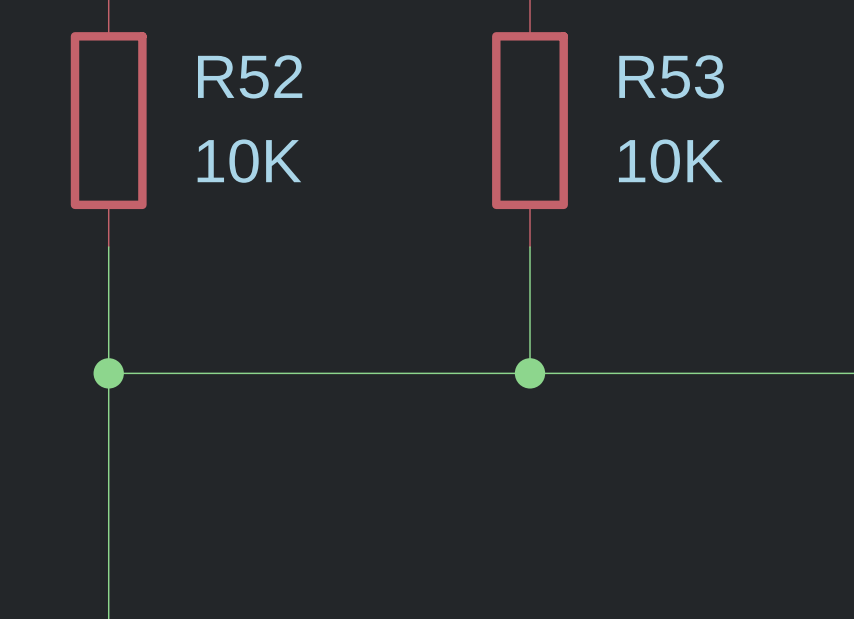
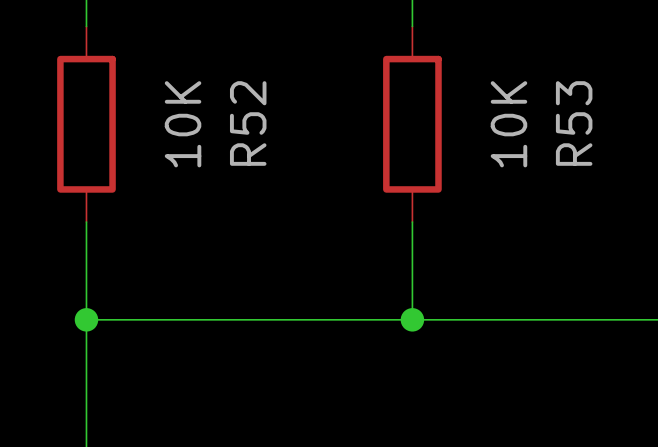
R52 name rotation: 0° (250, 76) -> 90° counterclockwise (248, 123)
R53 name rotation: 0° (671, 76) -> 90° counterclockwise (574, 123)
R52 value rotation: 0° (249, 161) -> 90° counterclockwise (183, 124)
R53 value rotation: 0° (670, 161) -> 90° counterclockwise (508, 124)

